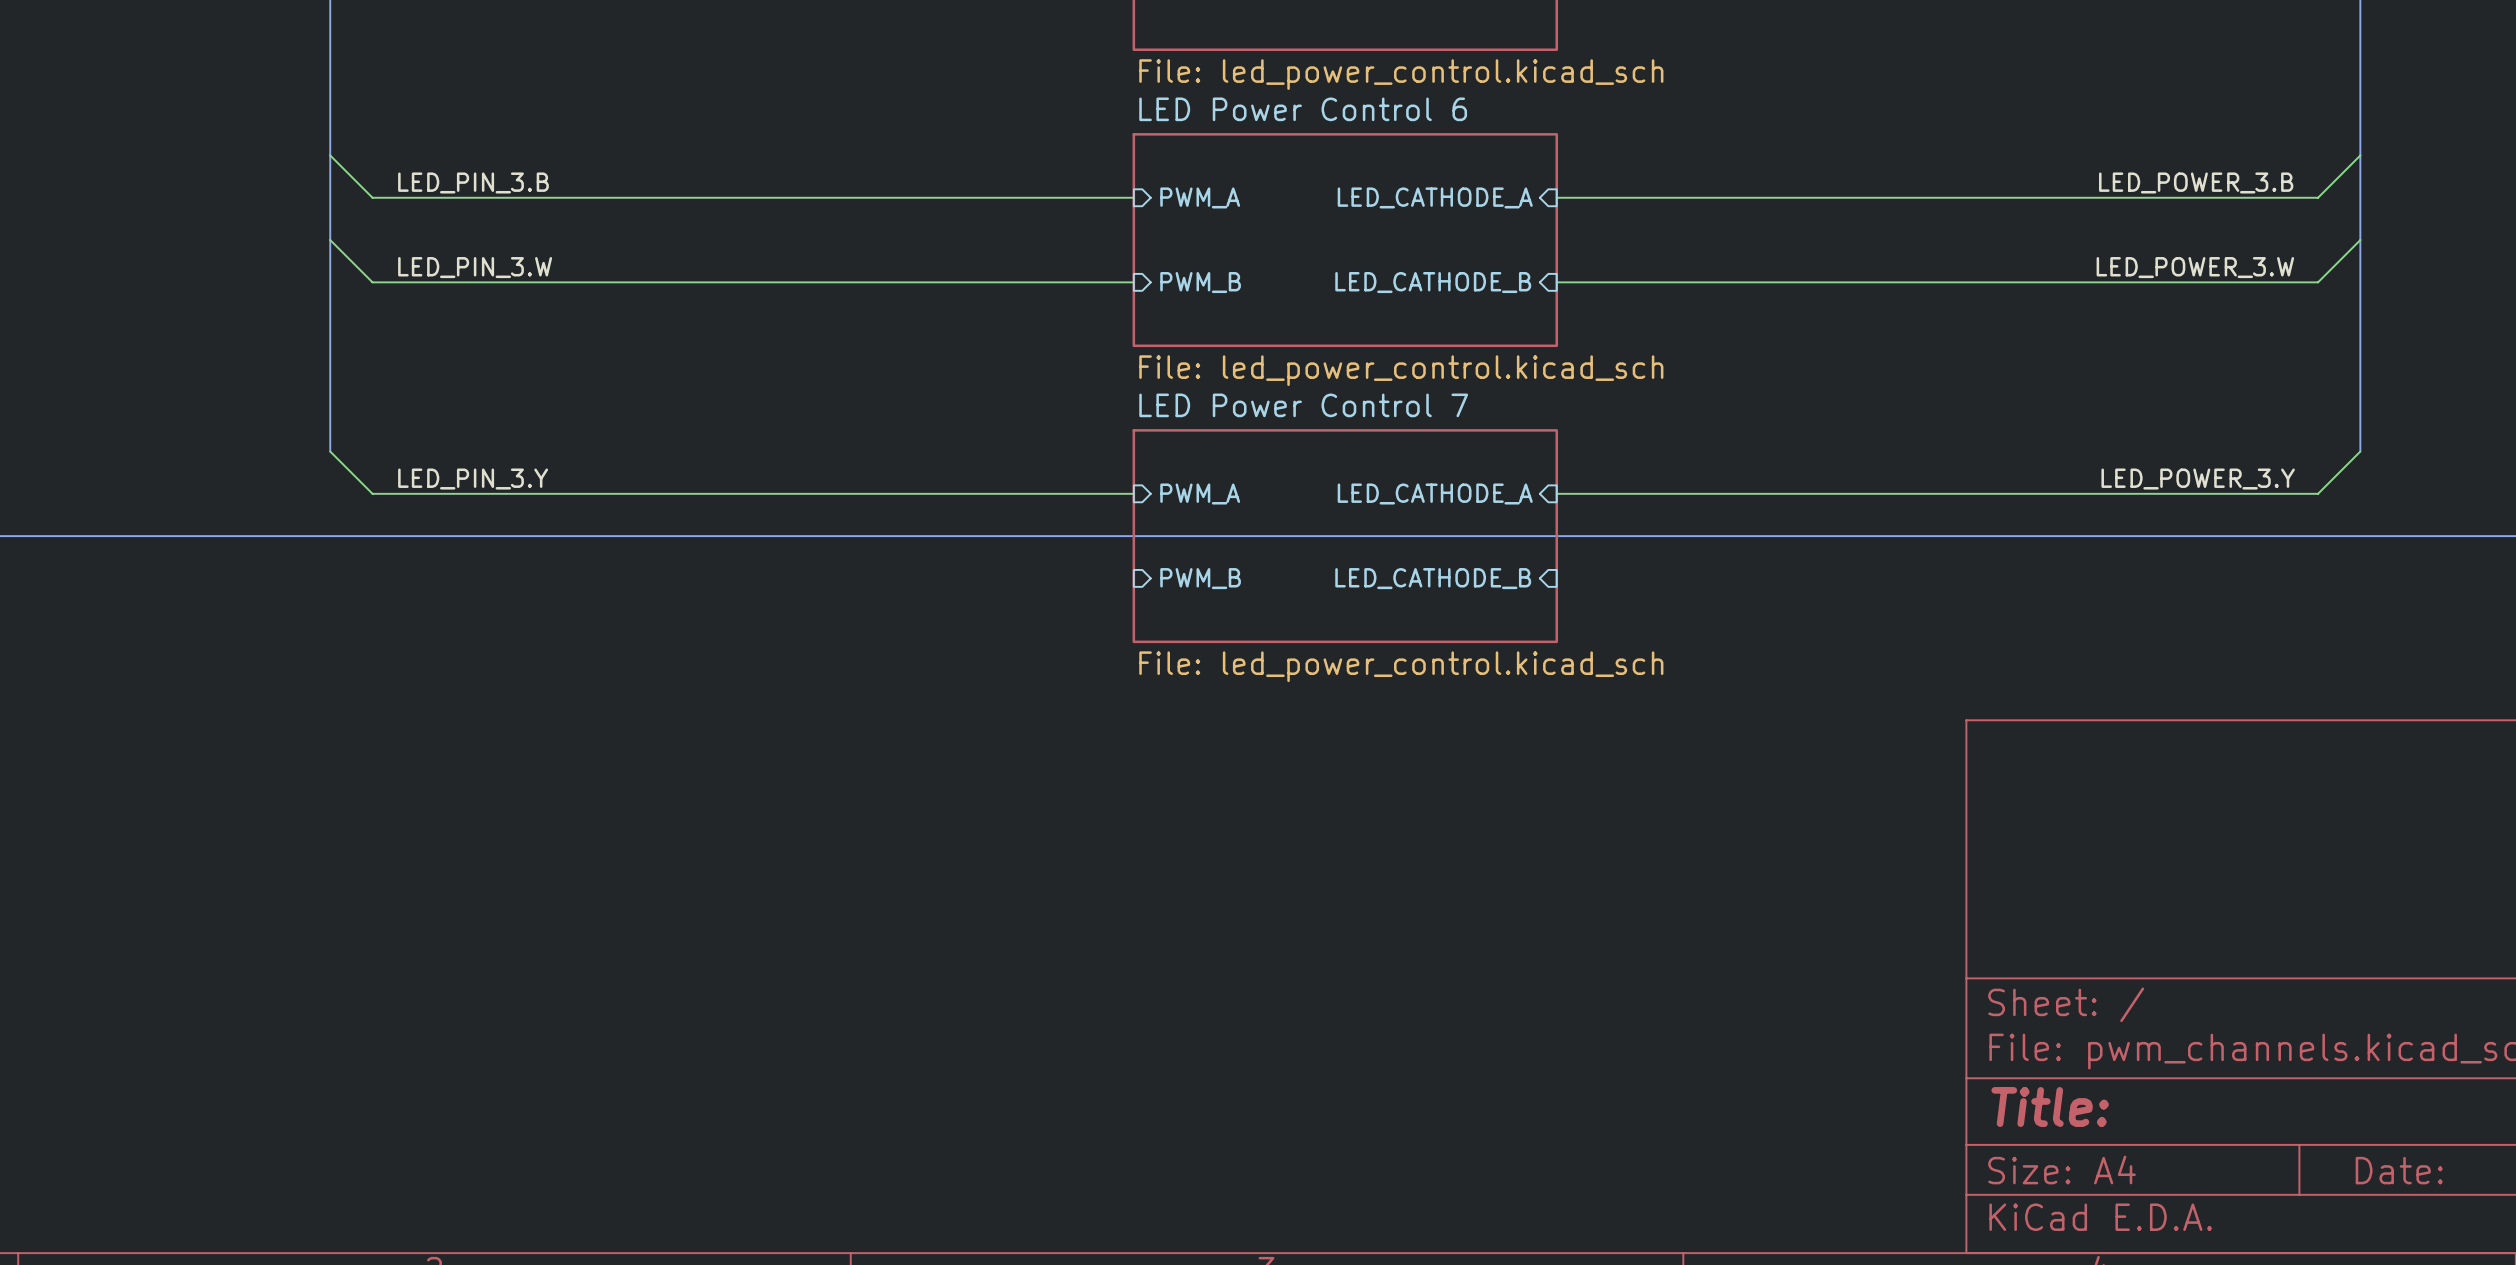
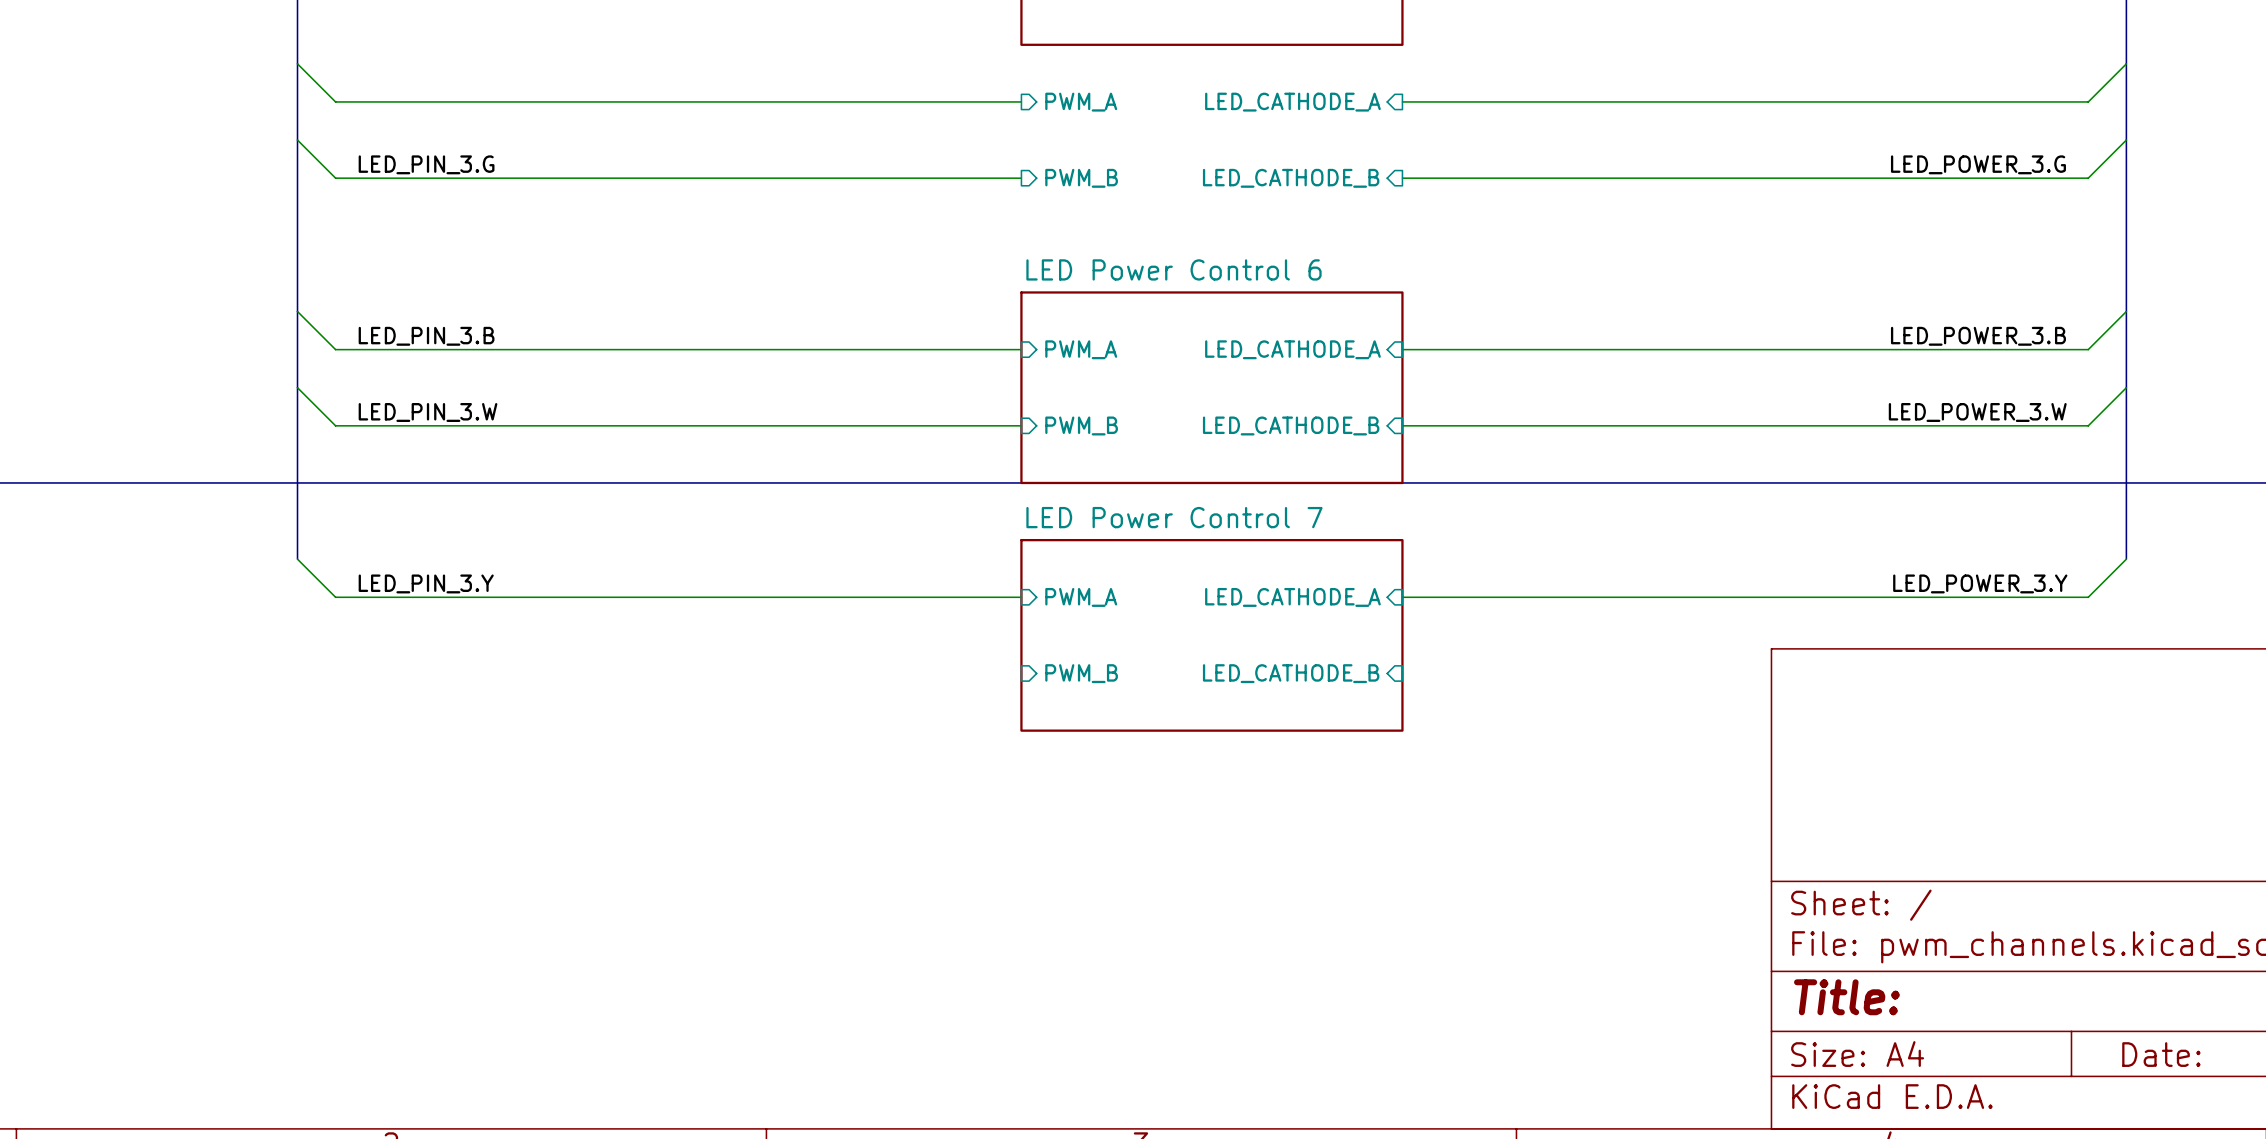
wire: none -> (297, 63) (335, 101) (1021, 101)
wire: none -> (2126, 63) (2088, 101) (1402, 101)
sheet value: File: led_power_control.kicad_sch (1401, 74) -> none
sheet pin: none -> PWM_A (1081, 102)
sheet pin: none -> LED_CATHODE_A (1292, 102)
label: LED_PIN_3.B (473, 182) -> LED_PIN_3.G (426, 164)
label: LED_POWER_3.B (2196, 182) -> LED_POWER_3.G (1978, 164)
sheet pin: PWM_A (1200, 197) -> PWM_B (1081, 178)
sheet pin: LED_CATHODE_A (1435, 197) -> LED_CATHODE_B (1291, 178)
wire: (330, 240) (372, 282) (1133, 282) -> (297, 311) (335, 349) (1021, 349)
sheet LED Power Control 6 position: (1345, 240) -> (1211, 387)
wire: (2360, 240) (2318, 282) (1556, 282) -> (2126, 311) (2088, 349) (1402, 349)
label position: LED_PIN_3.W (475, 267) -> LED_PIN_3.W (428, 412)
label position: LED_POWER_3.W (2195, 267) -> LED_POWER_3.W (1977, 412)
sheet pin: PWM_B (1200, 282) -> none
sheet pin: LED_CATHODE_B (1433, 282) -> none
sheet LED Power Control 6 value: File: led_power_control.kicad_sch (1401, 370) -> none
label: none -> LED_PIN_3.B (426, 336)
label: none -> LED_POWER_3.B (1978, 336)
sheet pin: none -> PWM_A (1081, 349)
sheet pin: none -> LED_CATHODE_A (1292, 349)
wire: (330, 451) (372, 493) (1133, 493) -> (297, 387) (335, 425) (1021, 425)
bus: none -> (297, 406) (297, 559)
wire: (2360, 451) (2318, 493) (1556, 493) -> (2126, 387) (2088, 425) (1402, 425)
bus: none -> (2126, 406) (2126, 559)
label position: LED_PIN_3.Y (473, 479) -> LED_PIN_3.Y (426, 583)
label position: LED_POWER_3.Y (2198, 479) -> LED_POWER_3.Y (1980, 583)
sheet pin: PWM_A (1200, 494) -> PWM_B (1081, 425)
sheet pin: LED_CATHODE_A (1435, 494) -> LED_CATHODE_B (1291, 425)
sheet LED Power Control 7 position: (1345, 536) -> (1211, 635)
sheet pin: PWM_B (1200, 578) -> none
sheet pin: LED_CATHODE_B (1433, 578) -> none
wire: none -> (297, 559) (335, 597) (1021, 597)
wire: none -> (2126, 559) (2088, 597) (1402, 597)
sheet pin: none -> PWM_A (1081, 597)
sheet pin: none -> LED_CATHODE_A (1292, 597)
sheet LED Power Control 7 value: File: led_power_control.kicad_sch (1401, 666) -> none
sheet pin: none -> PWM_B (1081, 673)
sheet pin: none -> LED_CATHODE_B (1291, 673)

